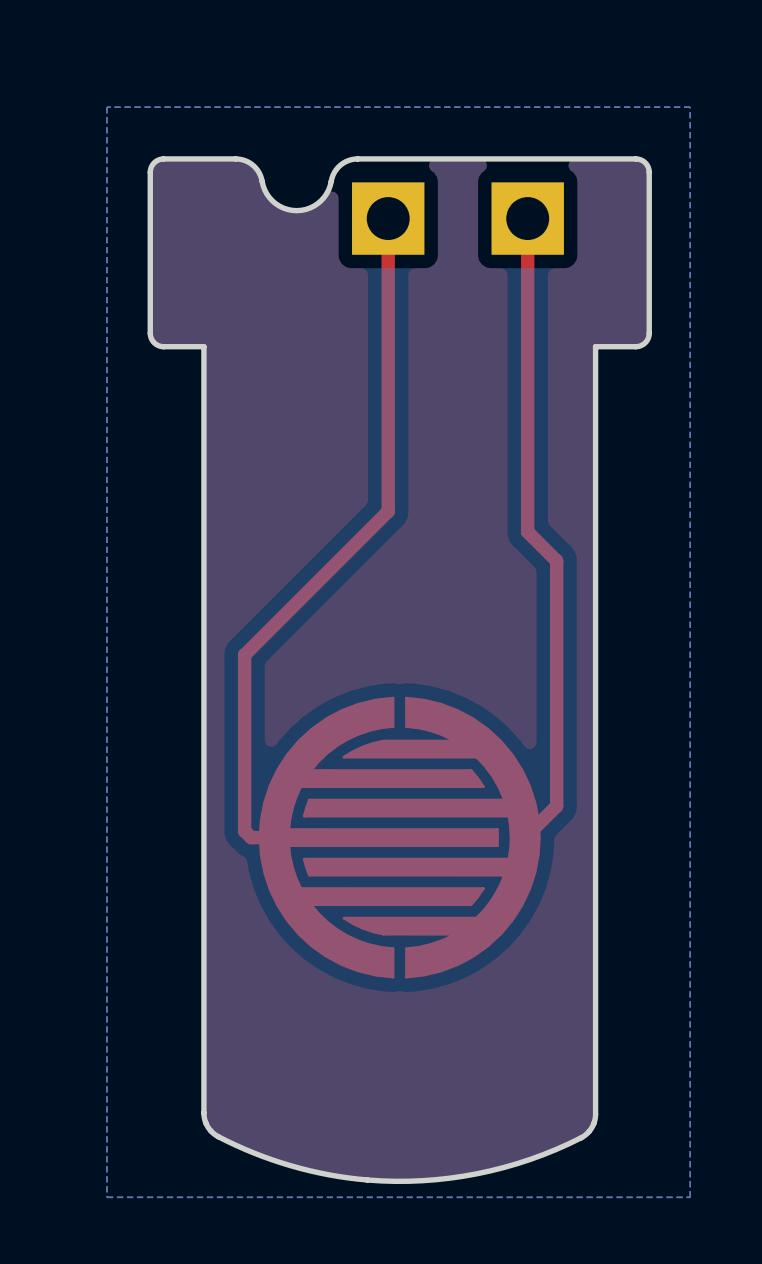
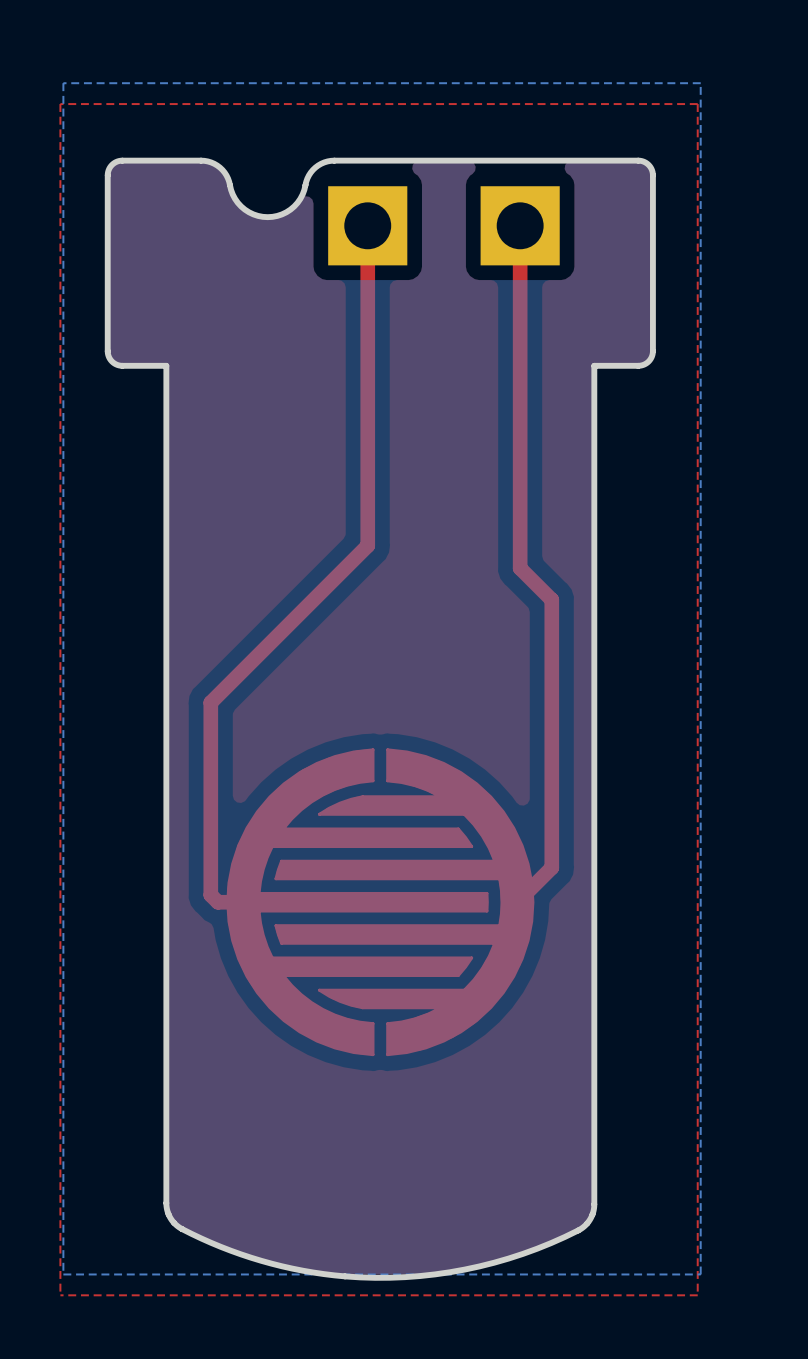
bottom zone outline: (690, 107) (106, 107) (106, 1197) (690, 1197) (690, 107) -> (700, 83) (63, 83) (63, 1274) (700, 1274) (700, 83)

